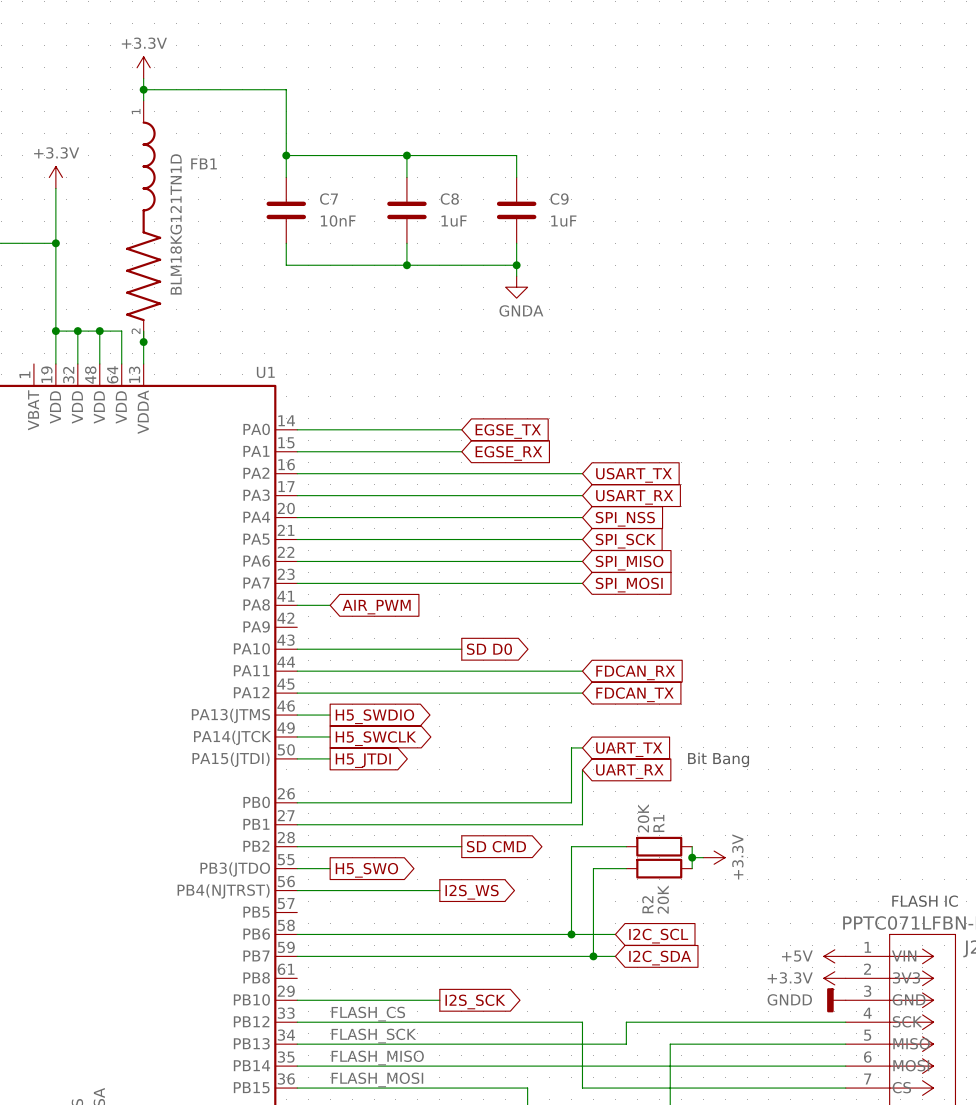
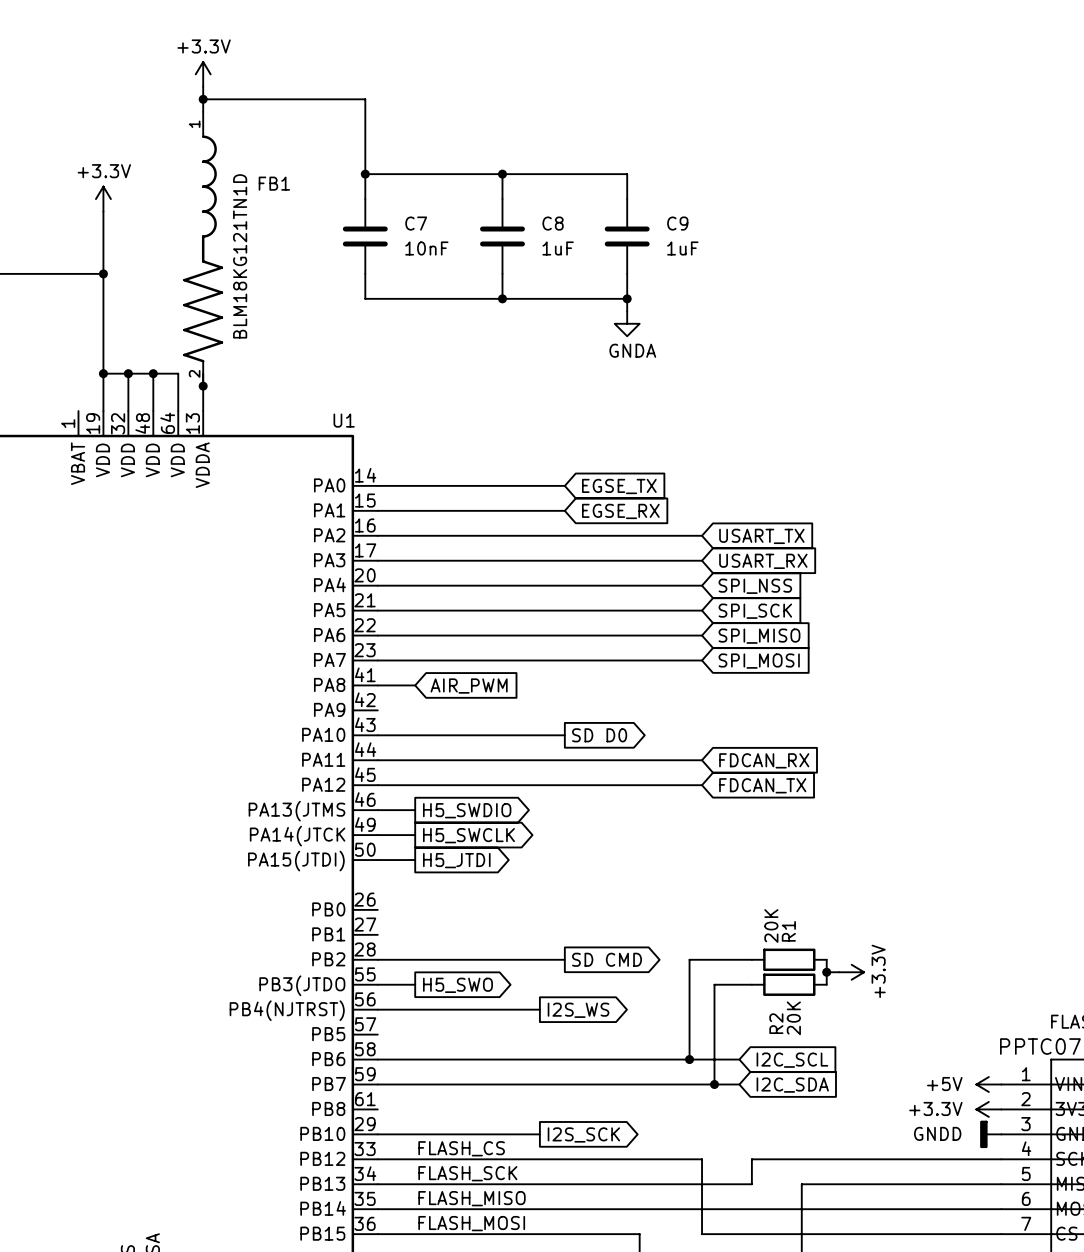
wire: (582, 747) (571, 747) (571, 802) (297, 802) -> none
global label: UART_TX (629, 749) -> none
text: Bit Bang (718, 759) -> none
wire: (582, 769) (582, 824) (297, 824) -> none
global label: UART_RX (629, 771) -> none

